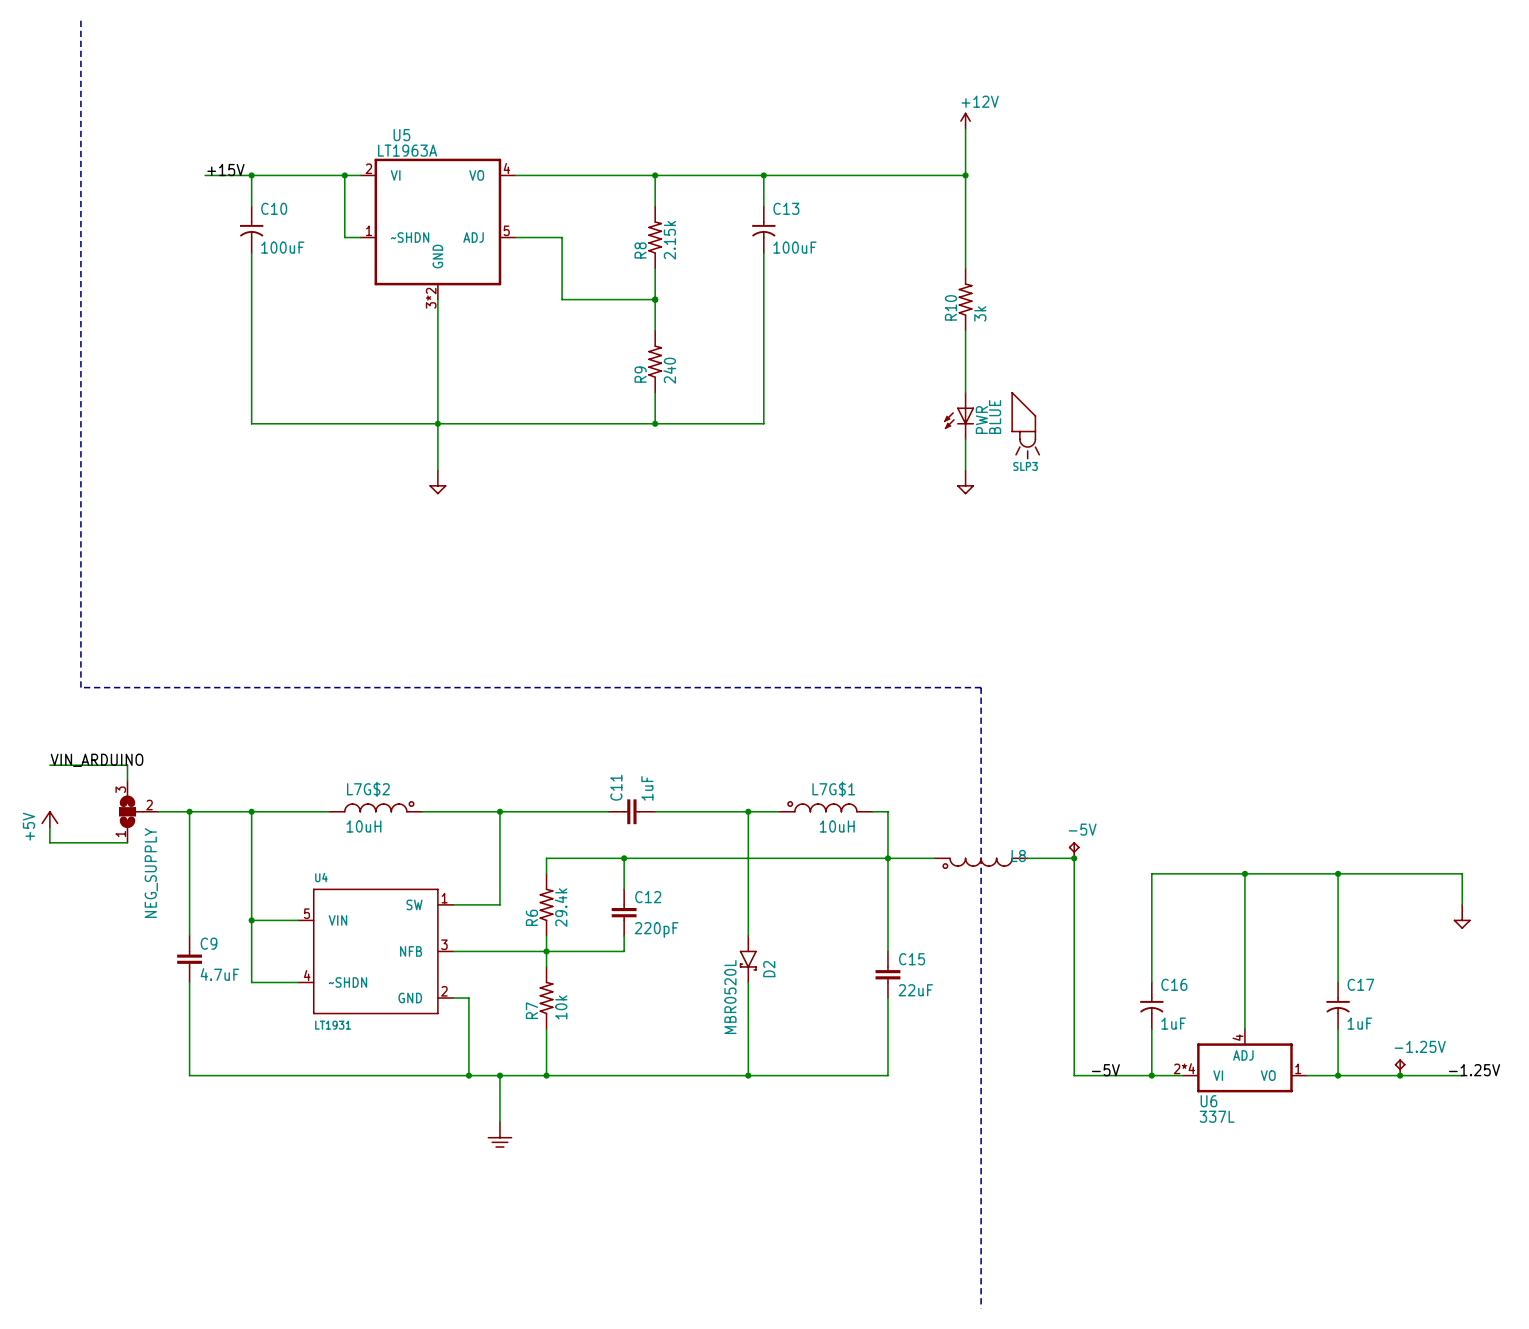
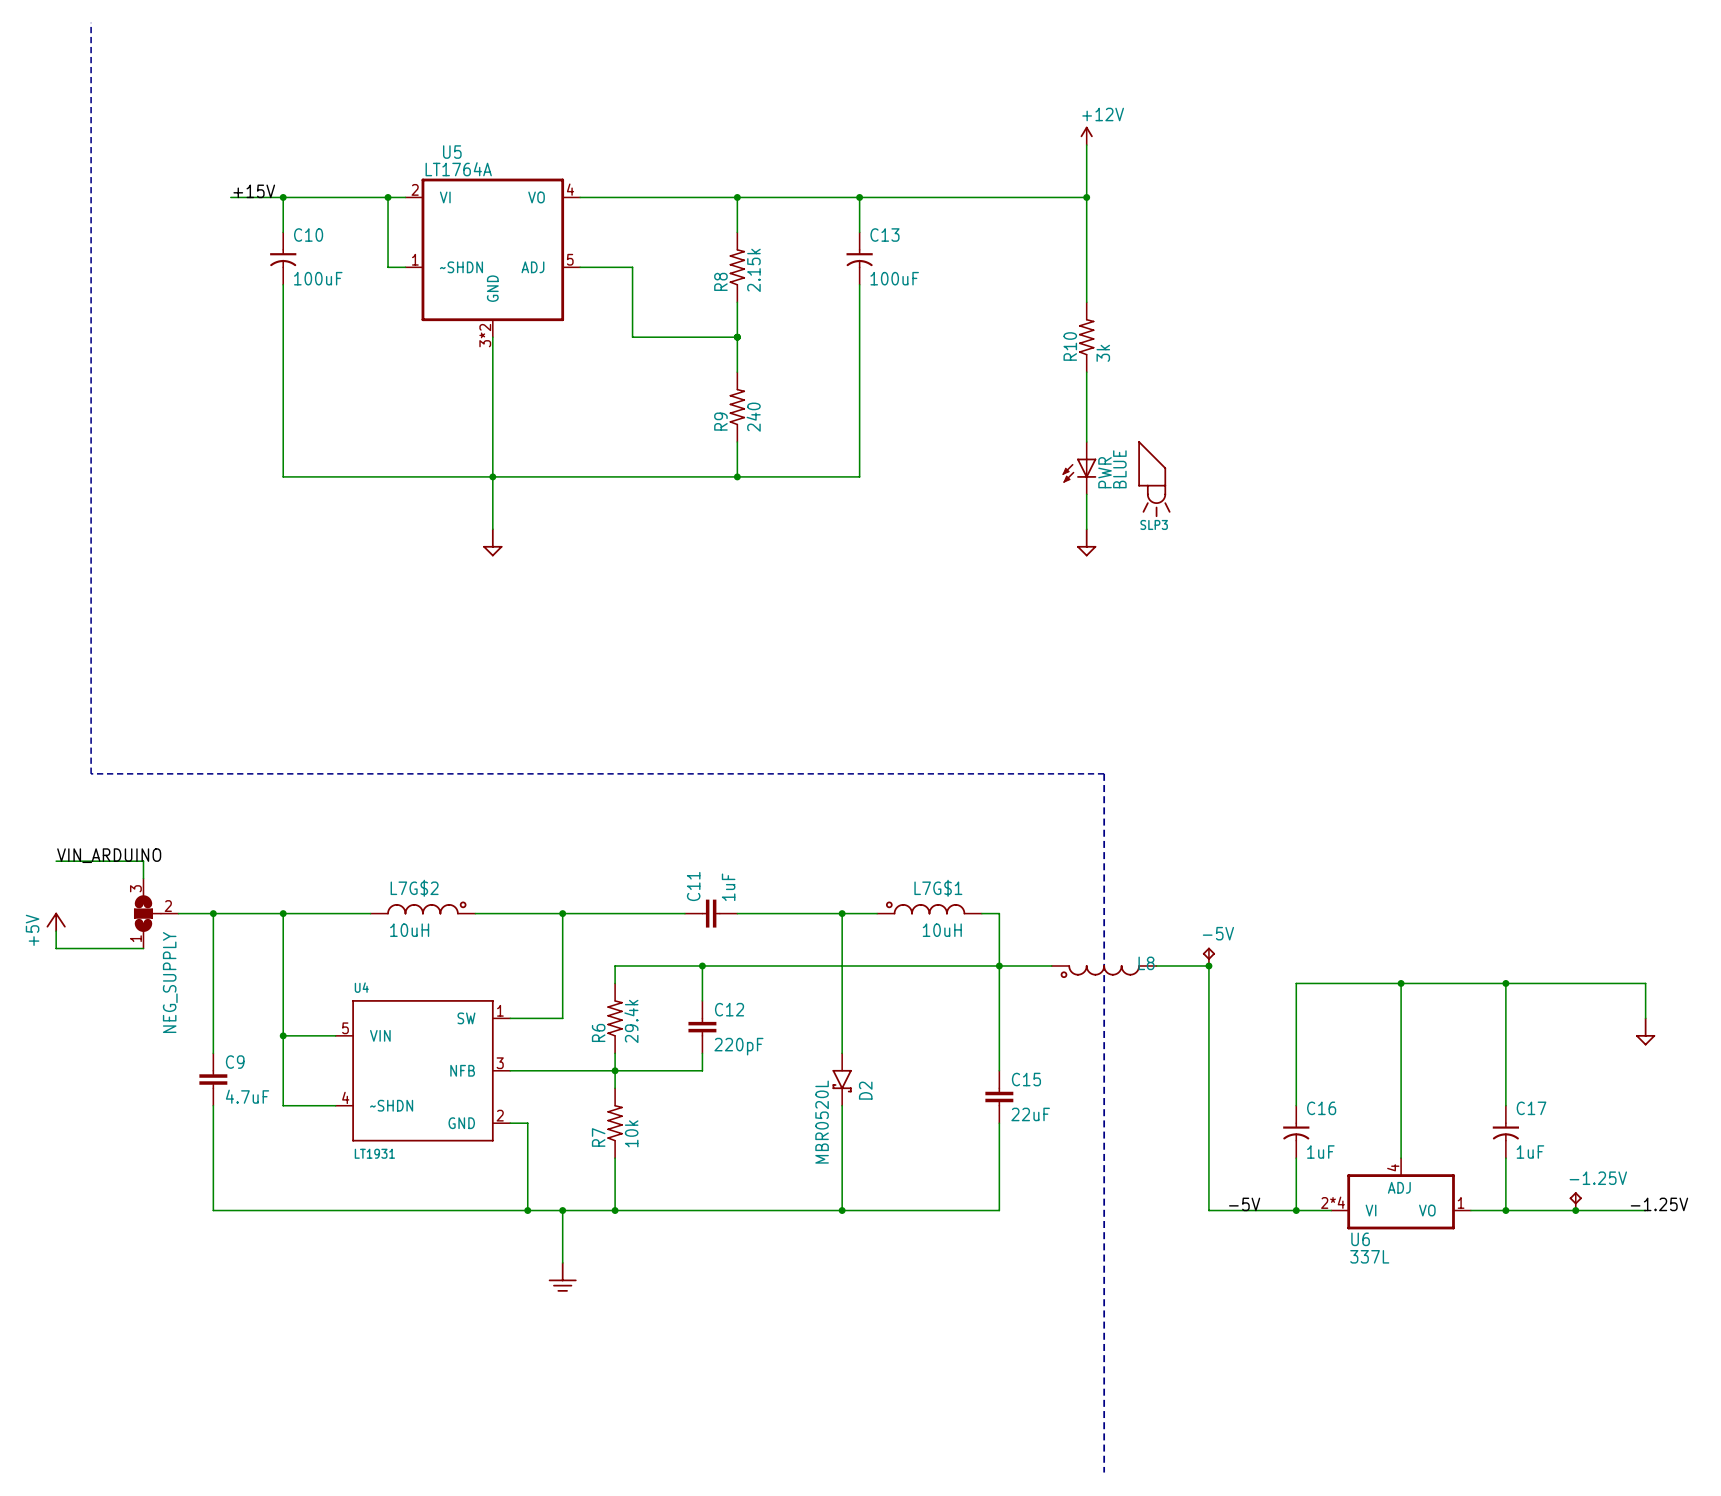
U5 value: LT1963A (407, 150) -> LT1764A (458, 169)

